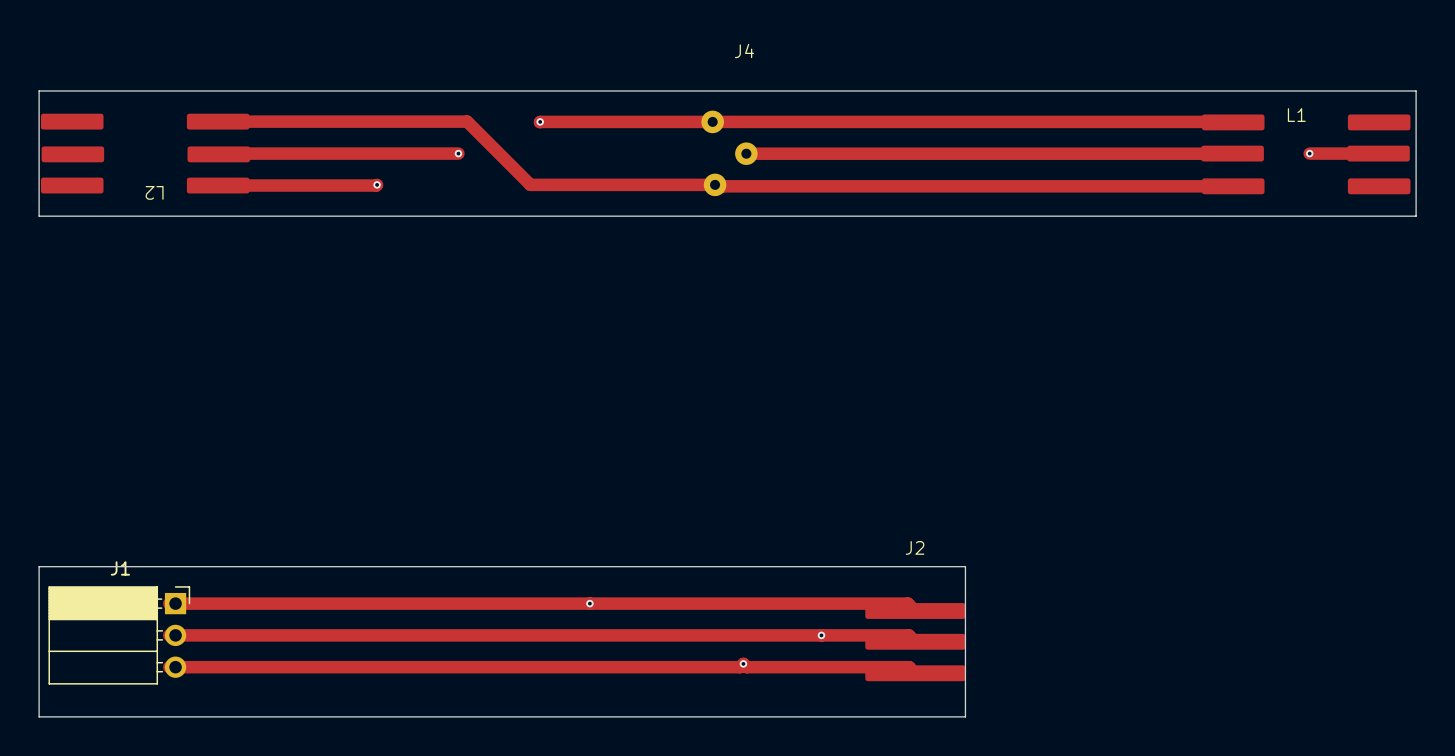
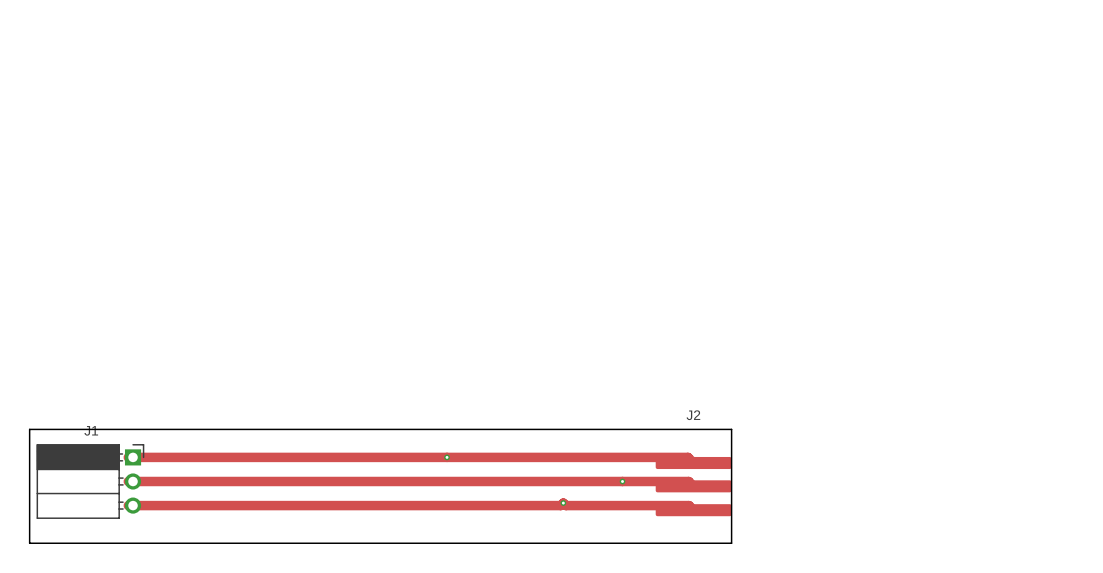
board edge: (39, 90) (1416, 90) (1416, 216) (39, 216) (39, 90) -> none
track: (218, 121) (467, 121) (530, 184) (1233, 186) -> none
via: (540, 121) -> none
track: (539, 122) (1233, 122) -> none
L2: (145, 153) -> none
track: (458, 153) (218, 154) -> none
via: (458, 153) -> none
J4: (729, 153) -> none
track: (746, 153) (1232, 153) -> none
track: (1309, 153) (1378, 153) -> none
via: (1309, 153) -> none
L1: (1305, 154) -> none
track: (377, 184) (218, 185) -> none
via: (377, 184) -> none

